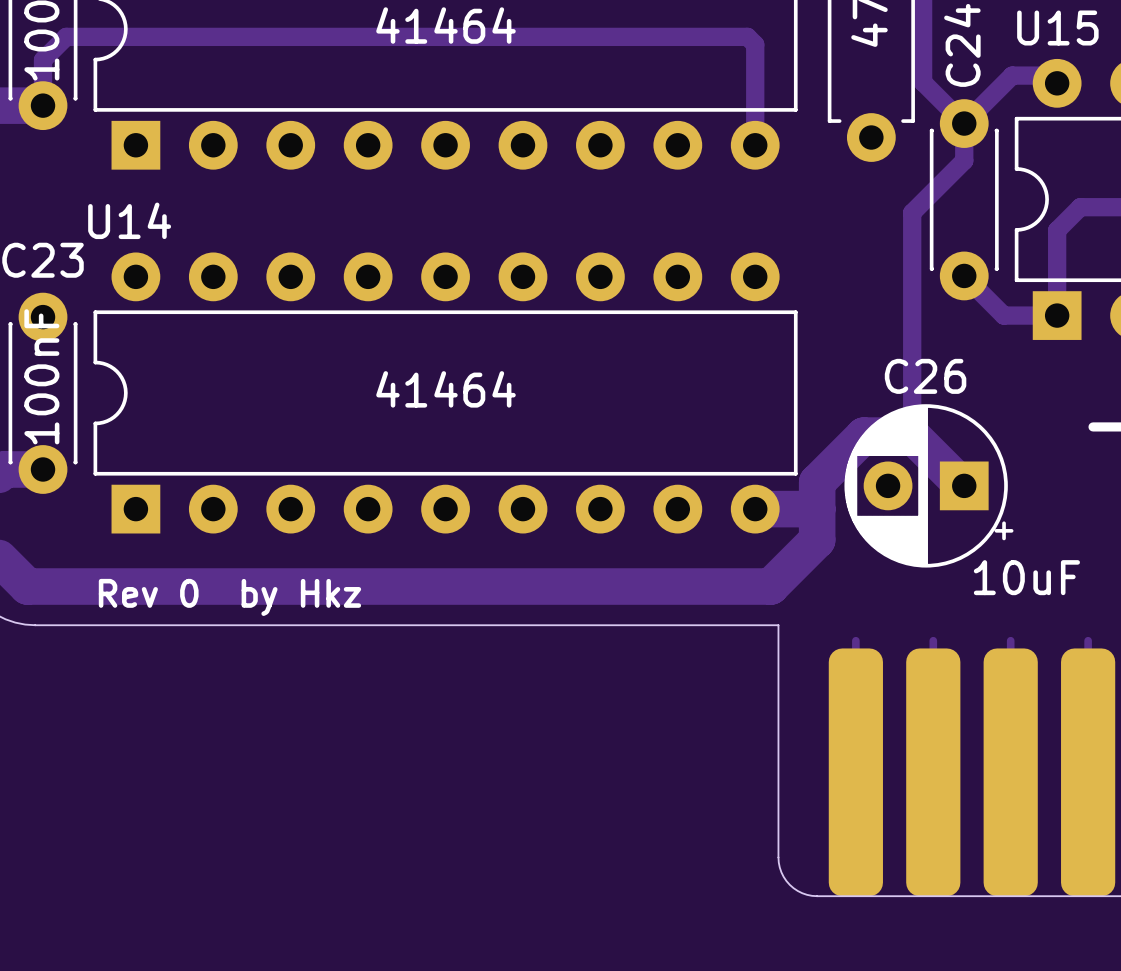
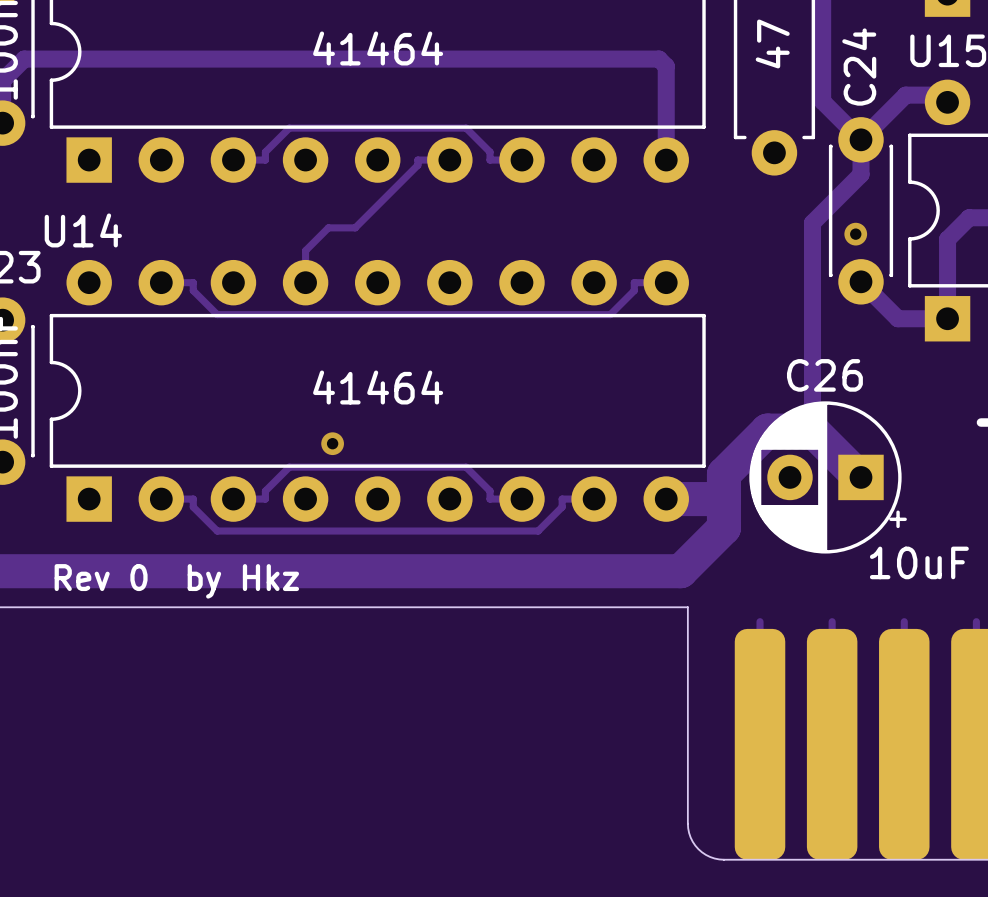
track: none -> (233, 160) (265, 160) (265, 152) (289, 128) (466, 128) (490, 152) (490, 160) (521, 160)
track: none -> (449, 160) (417, 160) (417, 165) (355, 227) (328, 227) (305, 250) (305, 282)
via: none -> (855, 234)
track: none -> (161, 282) (193, 282) (193, 290) (217, 314) (610, 314) (634, 290) (634, 282) (666, 282)
via: none -> (332, 443)
track: none -> (161, 499) (193, 499) (193, 507) (217, 531) (538, 531) (562, 507) (562, 499) (594, 499)
track: none -> (233, 499) (265, 499) (265, 491) (289, 467) (466, 467) (490, 491) (490, 499) (521, 499)

